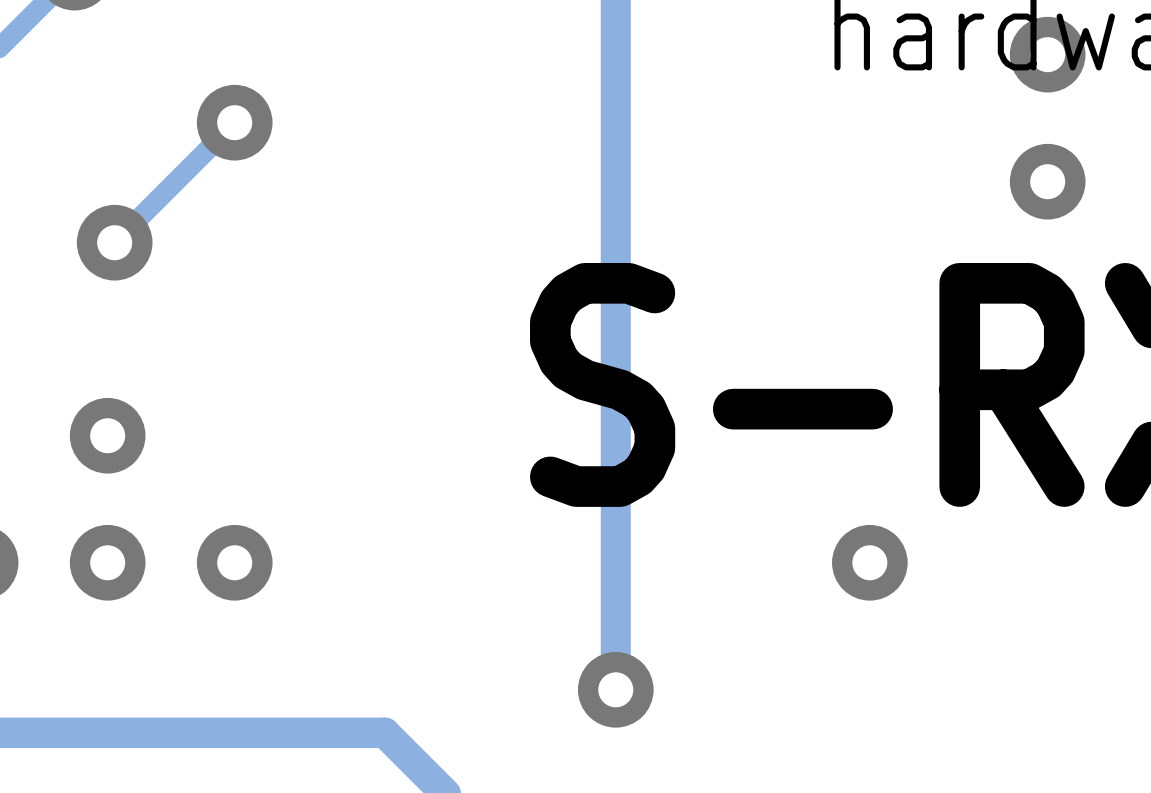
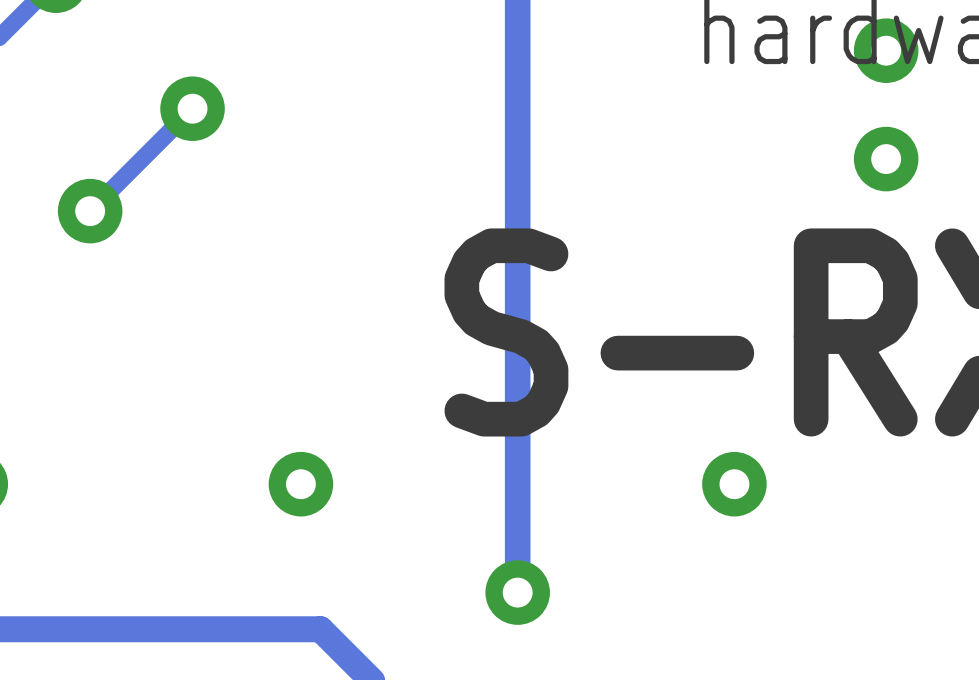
via: (107, 435) -> none
via: (107, 562) -> none
via: (234, 562) -> none
via: none -> (300, 484)

